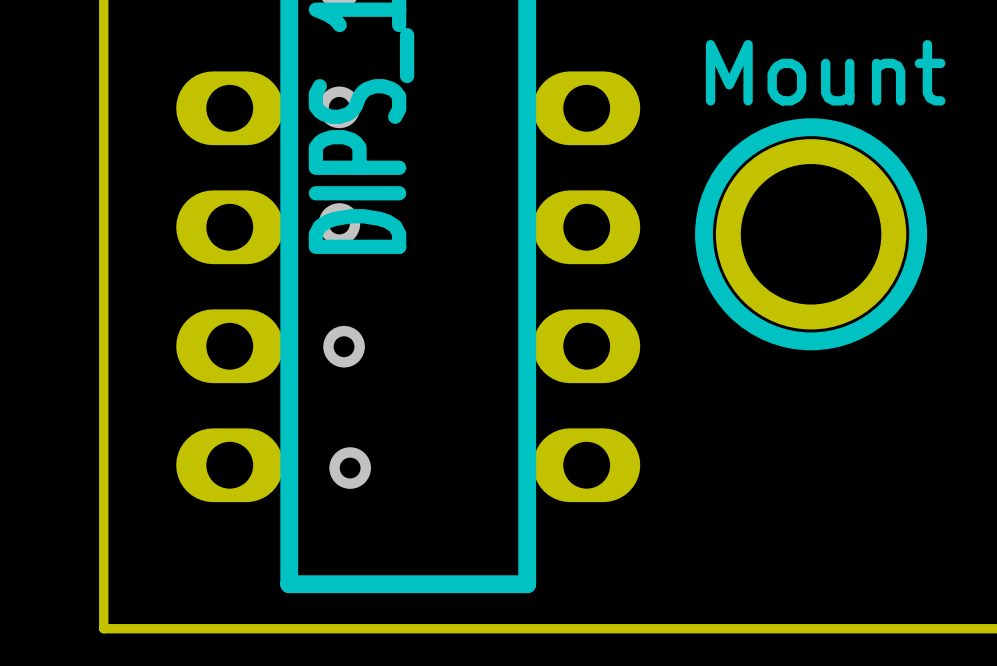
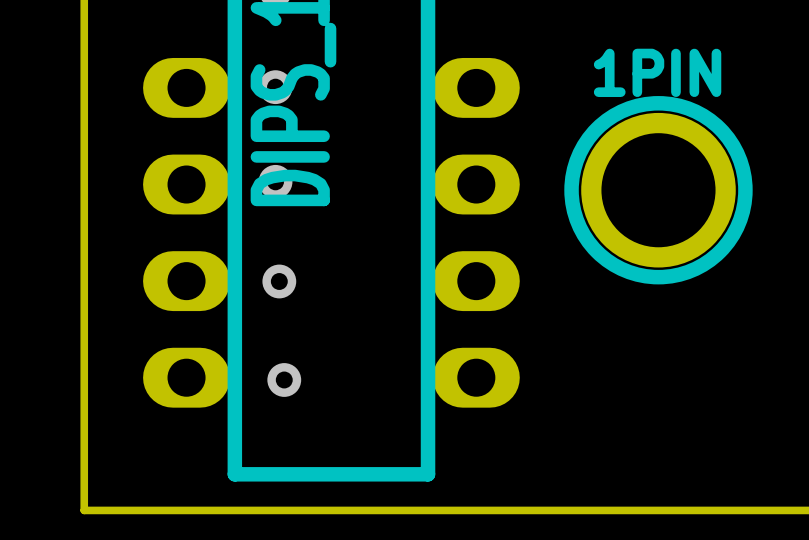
text: Mount (825, 72) -> none
1PIN name: none -> 1PIN (657, 72)

